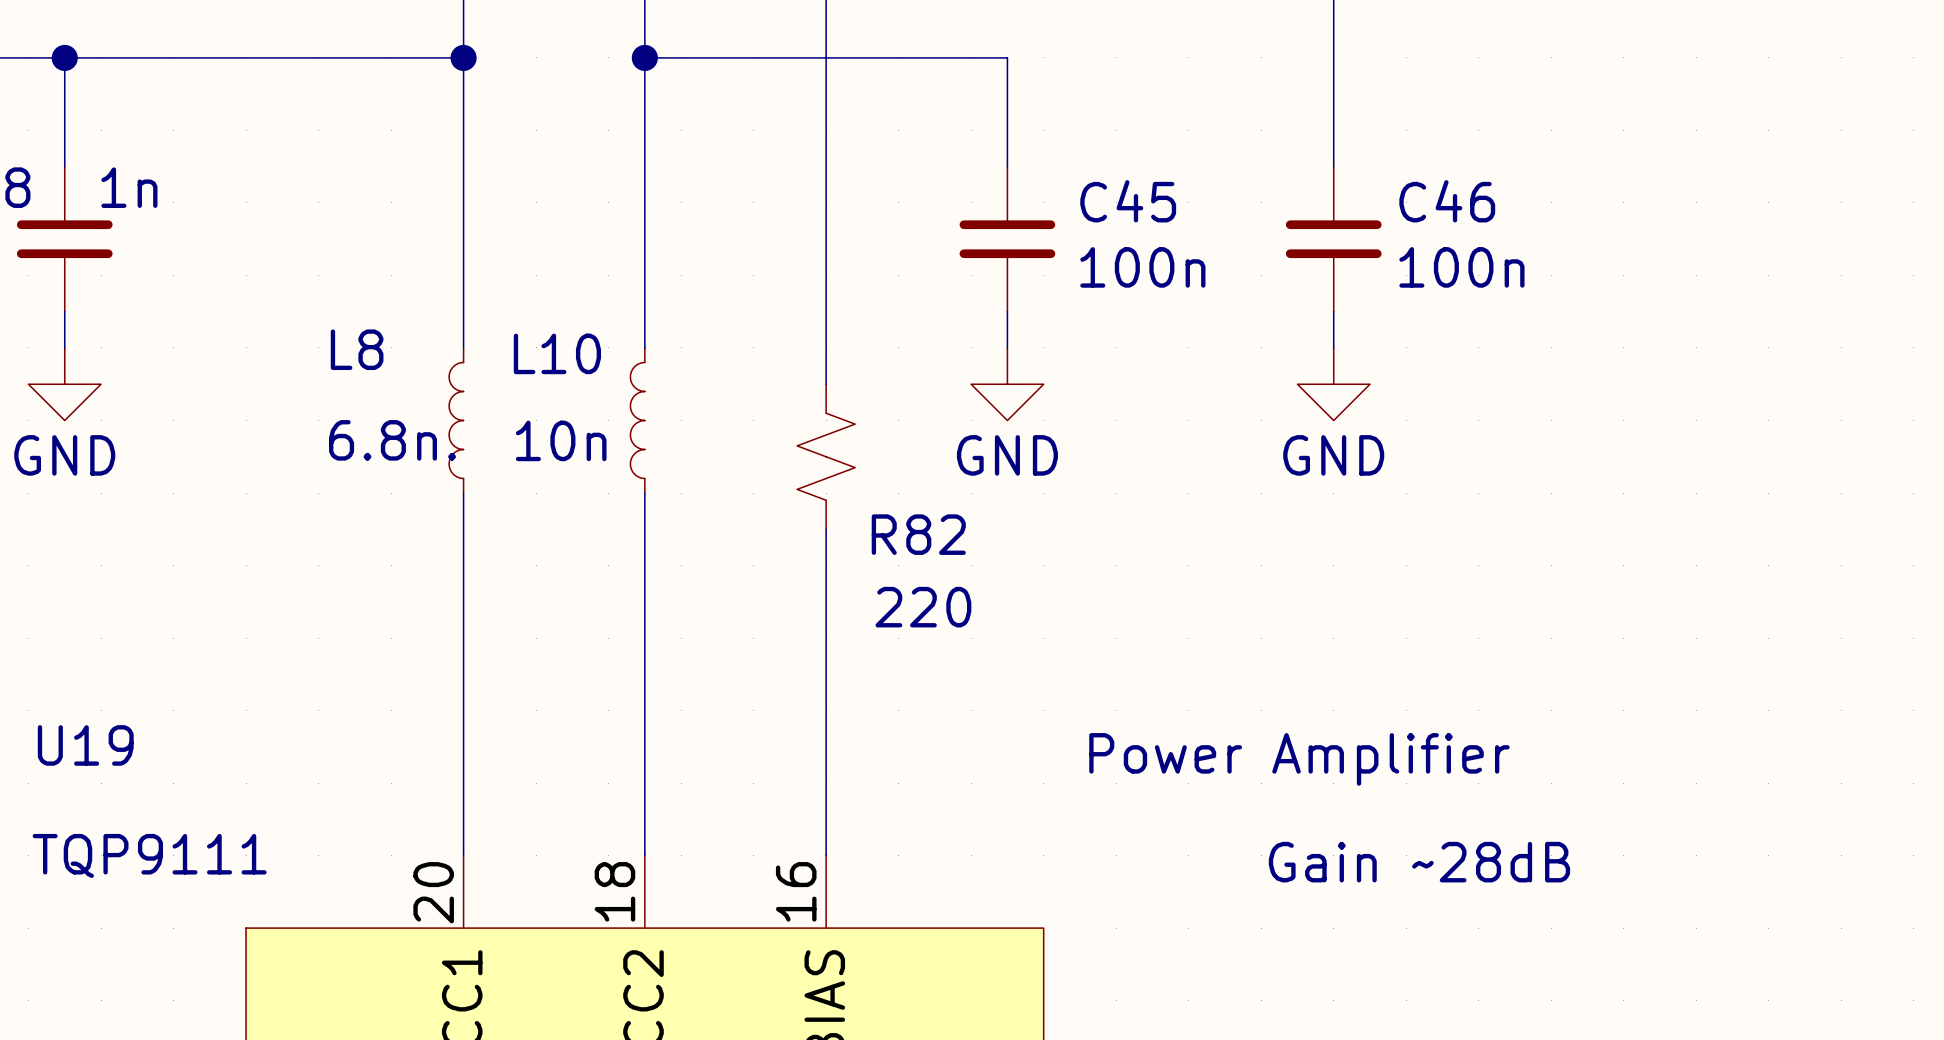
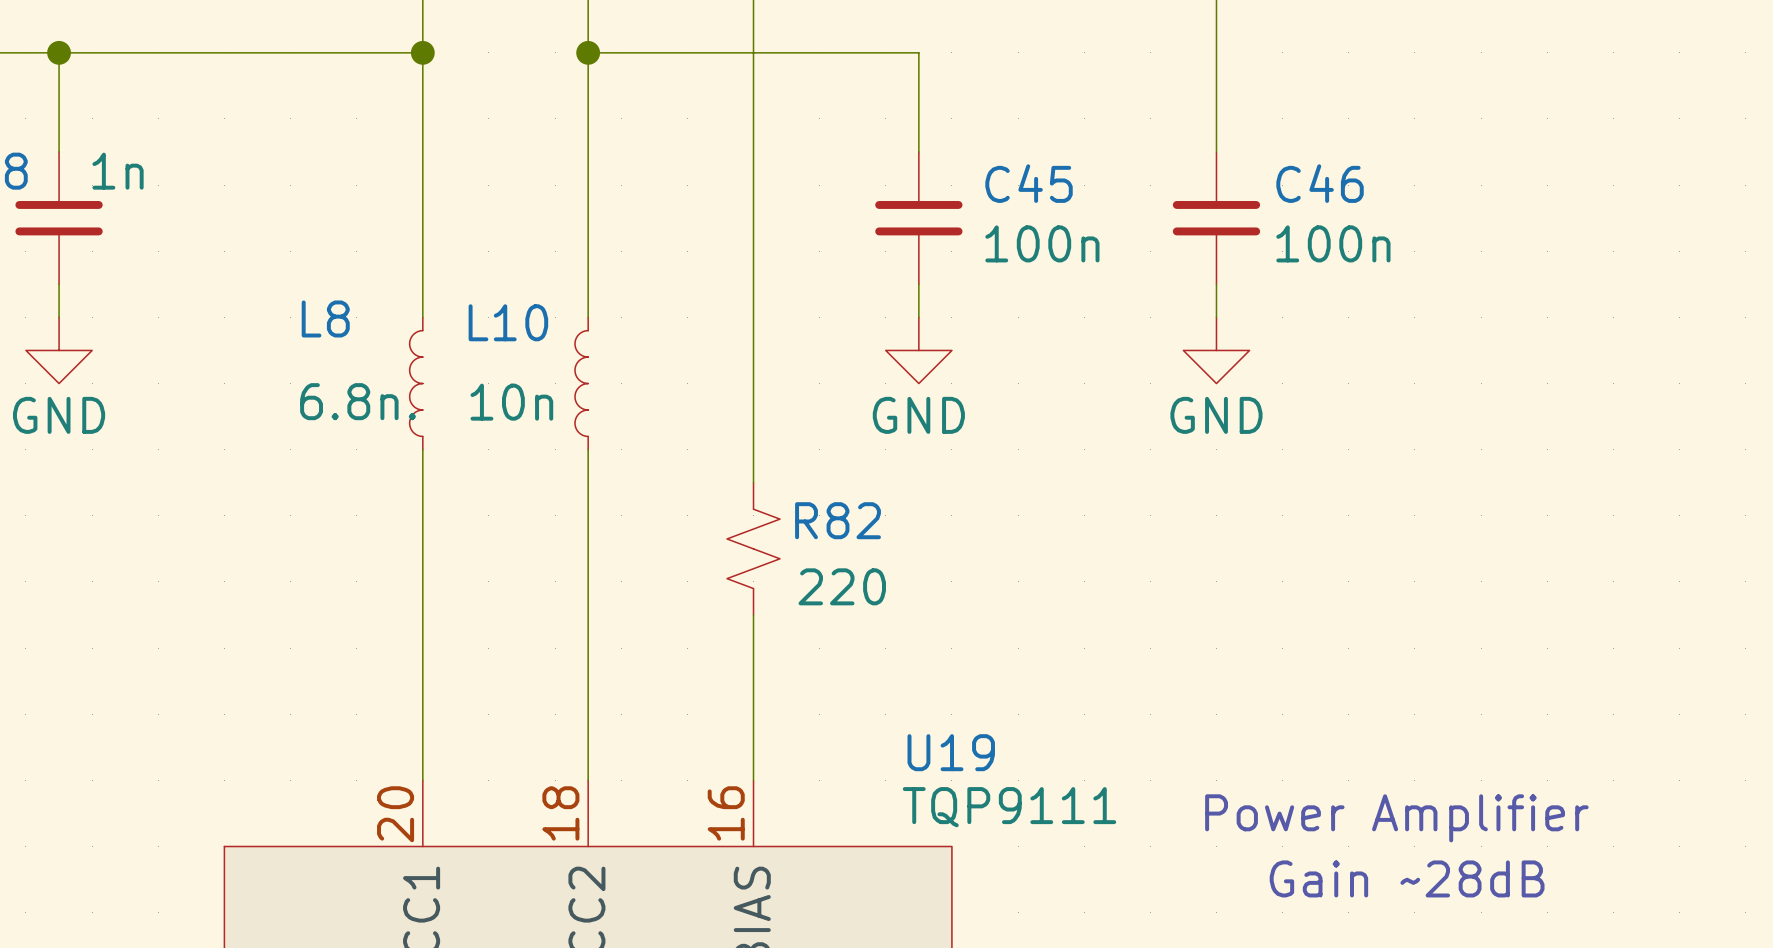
R82 position: (826, 456) -> (753, 548)
wire: (826, 529) (826, 674) -> (753, 482) (753, 350)
R82 name position: R82 (918, 534) -> R82 (838, 520)
R82 value position: 220 (923, 607) -> 220 (842, 586)
U19 name position: U19 (85, 745) -> U19 (951, 752)
text position: Power Amplifier (1299, 759) -> Power Amplifier (1396, 818)
U19 value position: TQP9111 (149, 855) -> TQP9111 (1009, 807)
text position: Gain ~28dB (1419, 862) -> Gain ~28dB (1407, 878)

